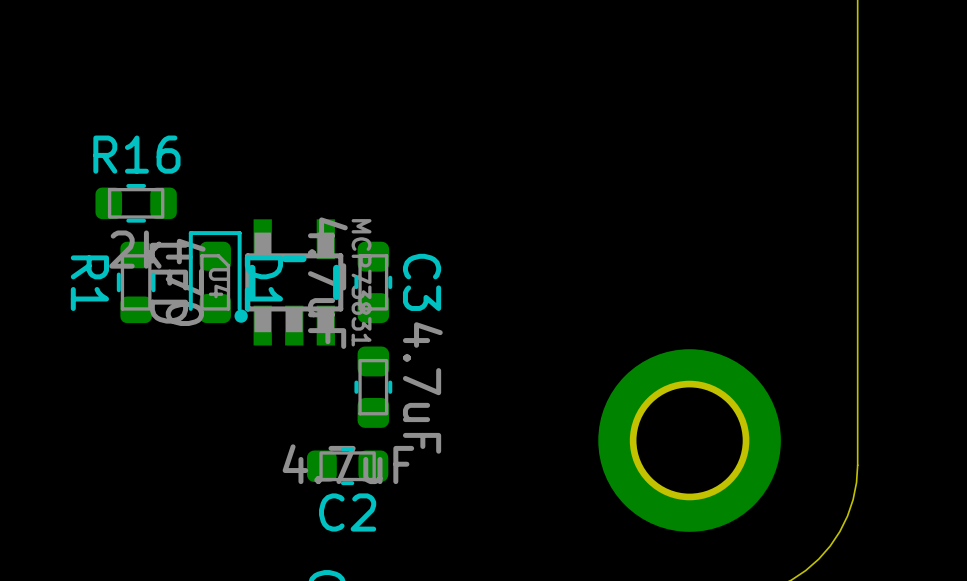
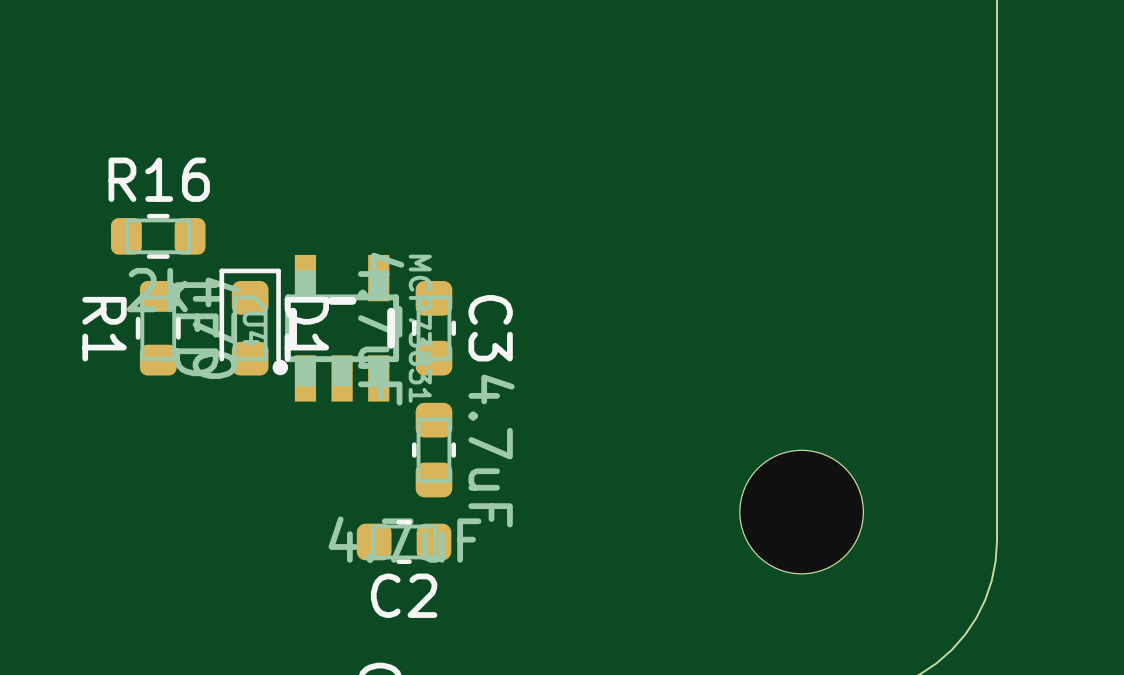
part footprint: [598, 349, 781, 532] -> [739, 450, 864, 574]

